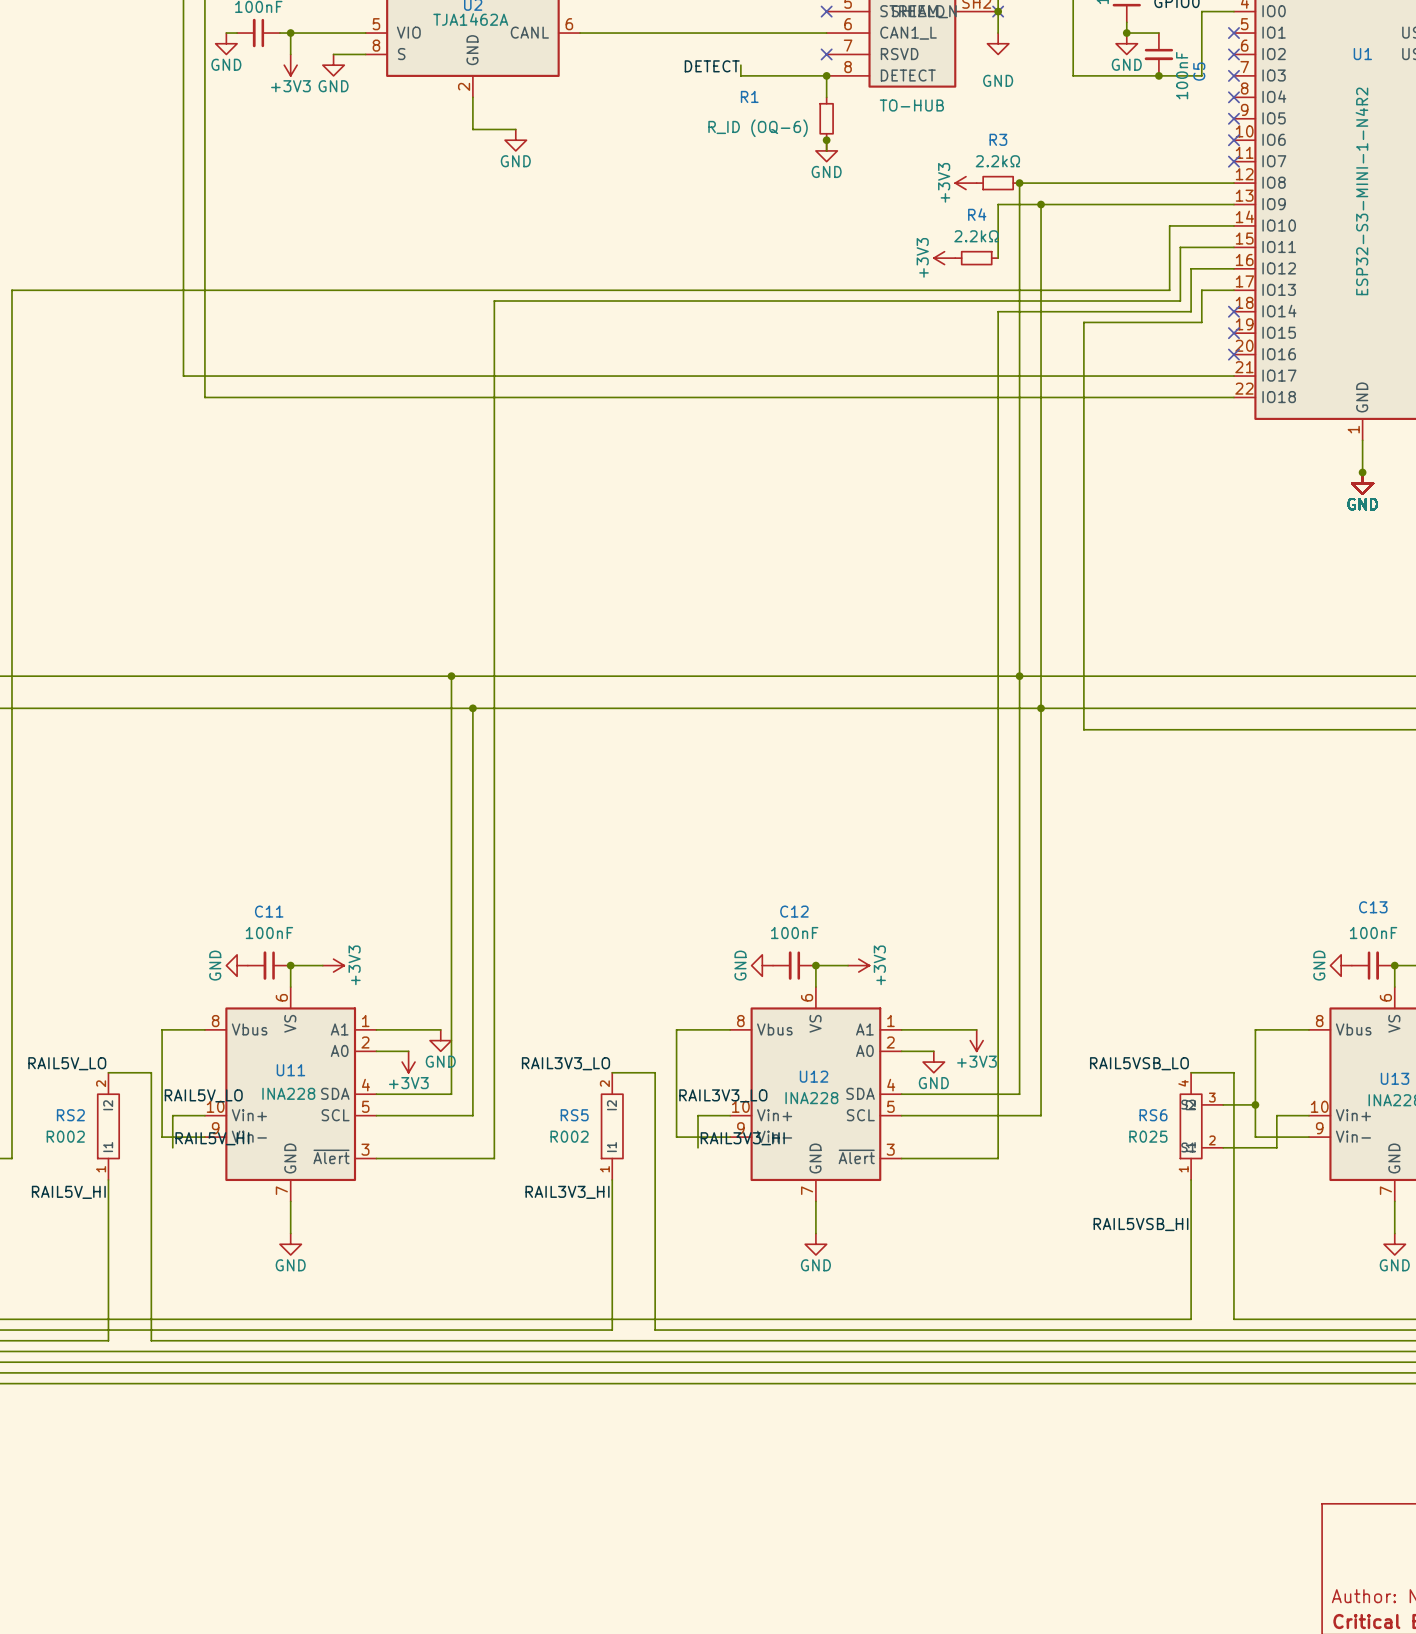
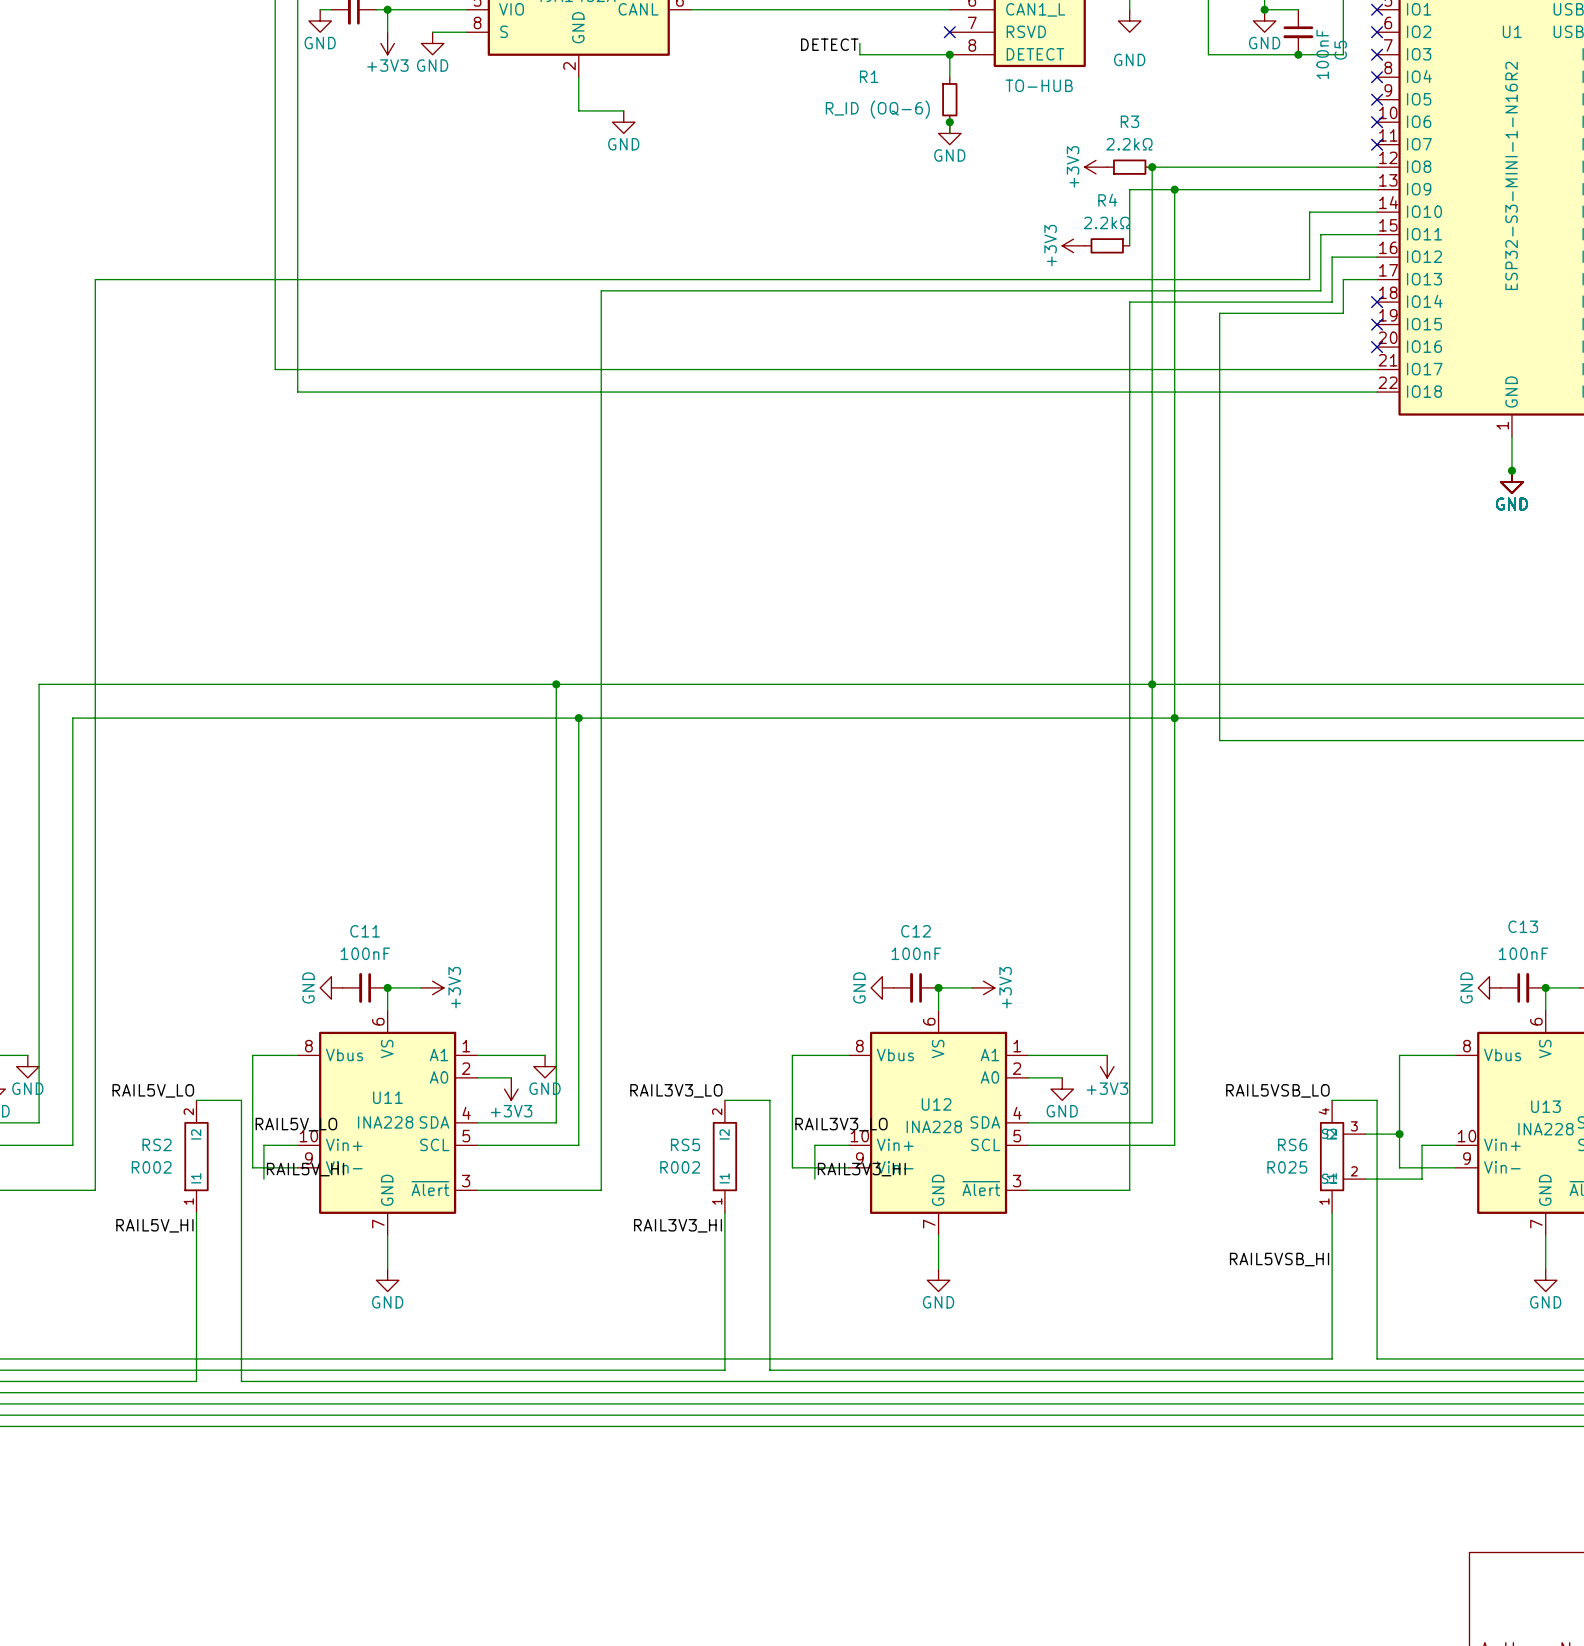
U1 value: ESP32-S3-MINI-1-N4R2 (1361, 191) -> ESP32-S3-MINI-1-N16R2 (1511, 175)

